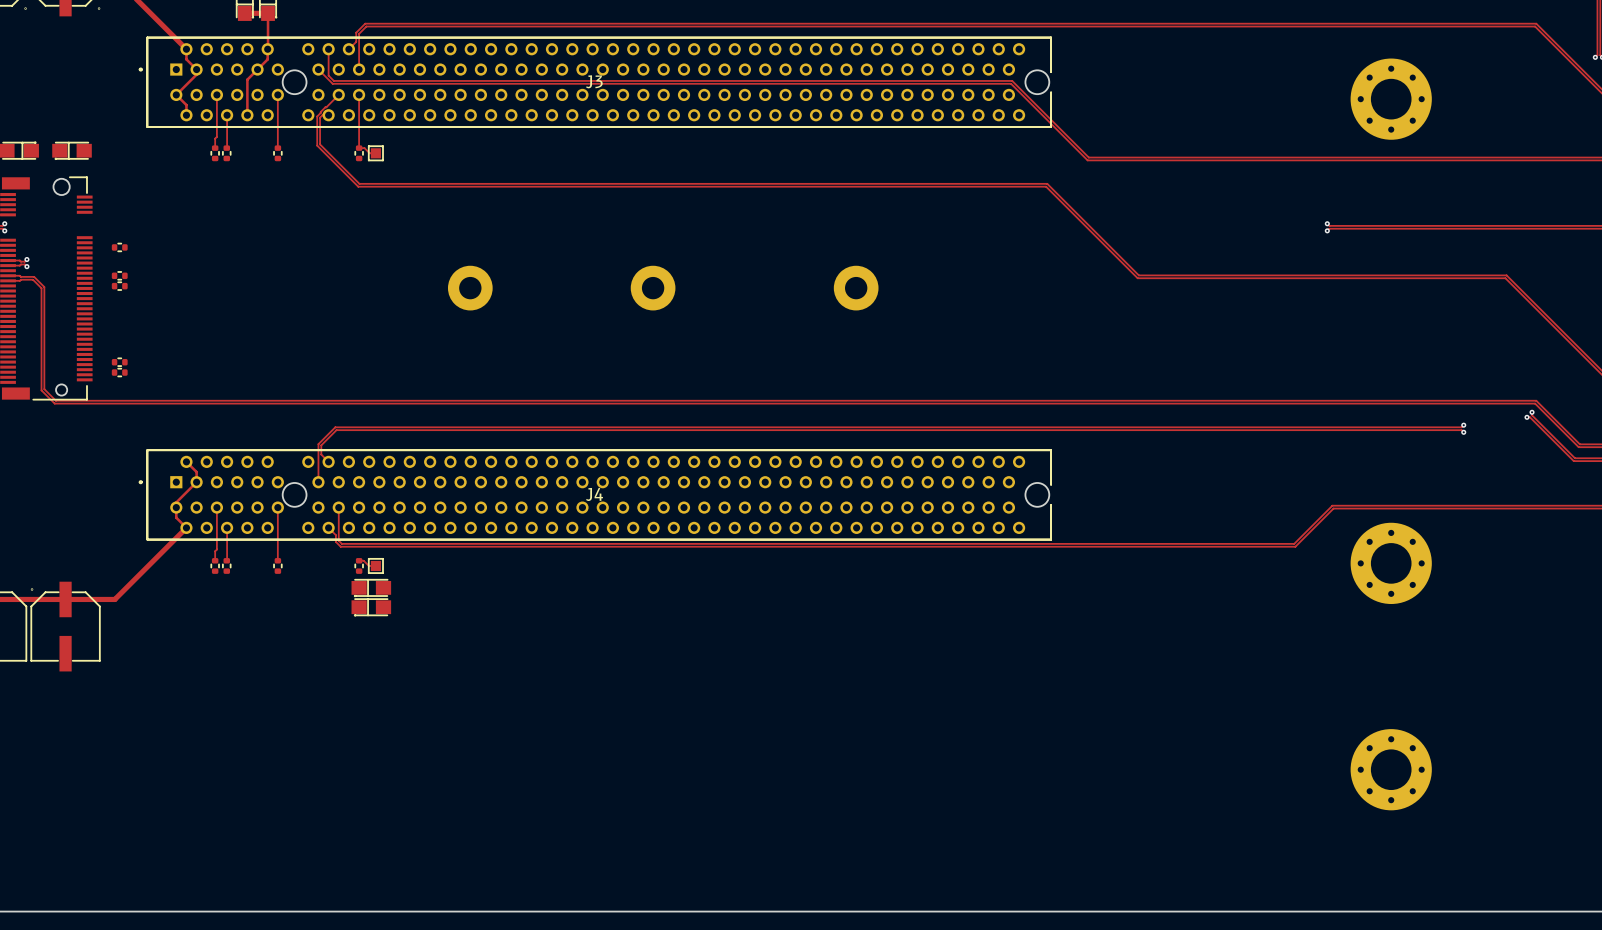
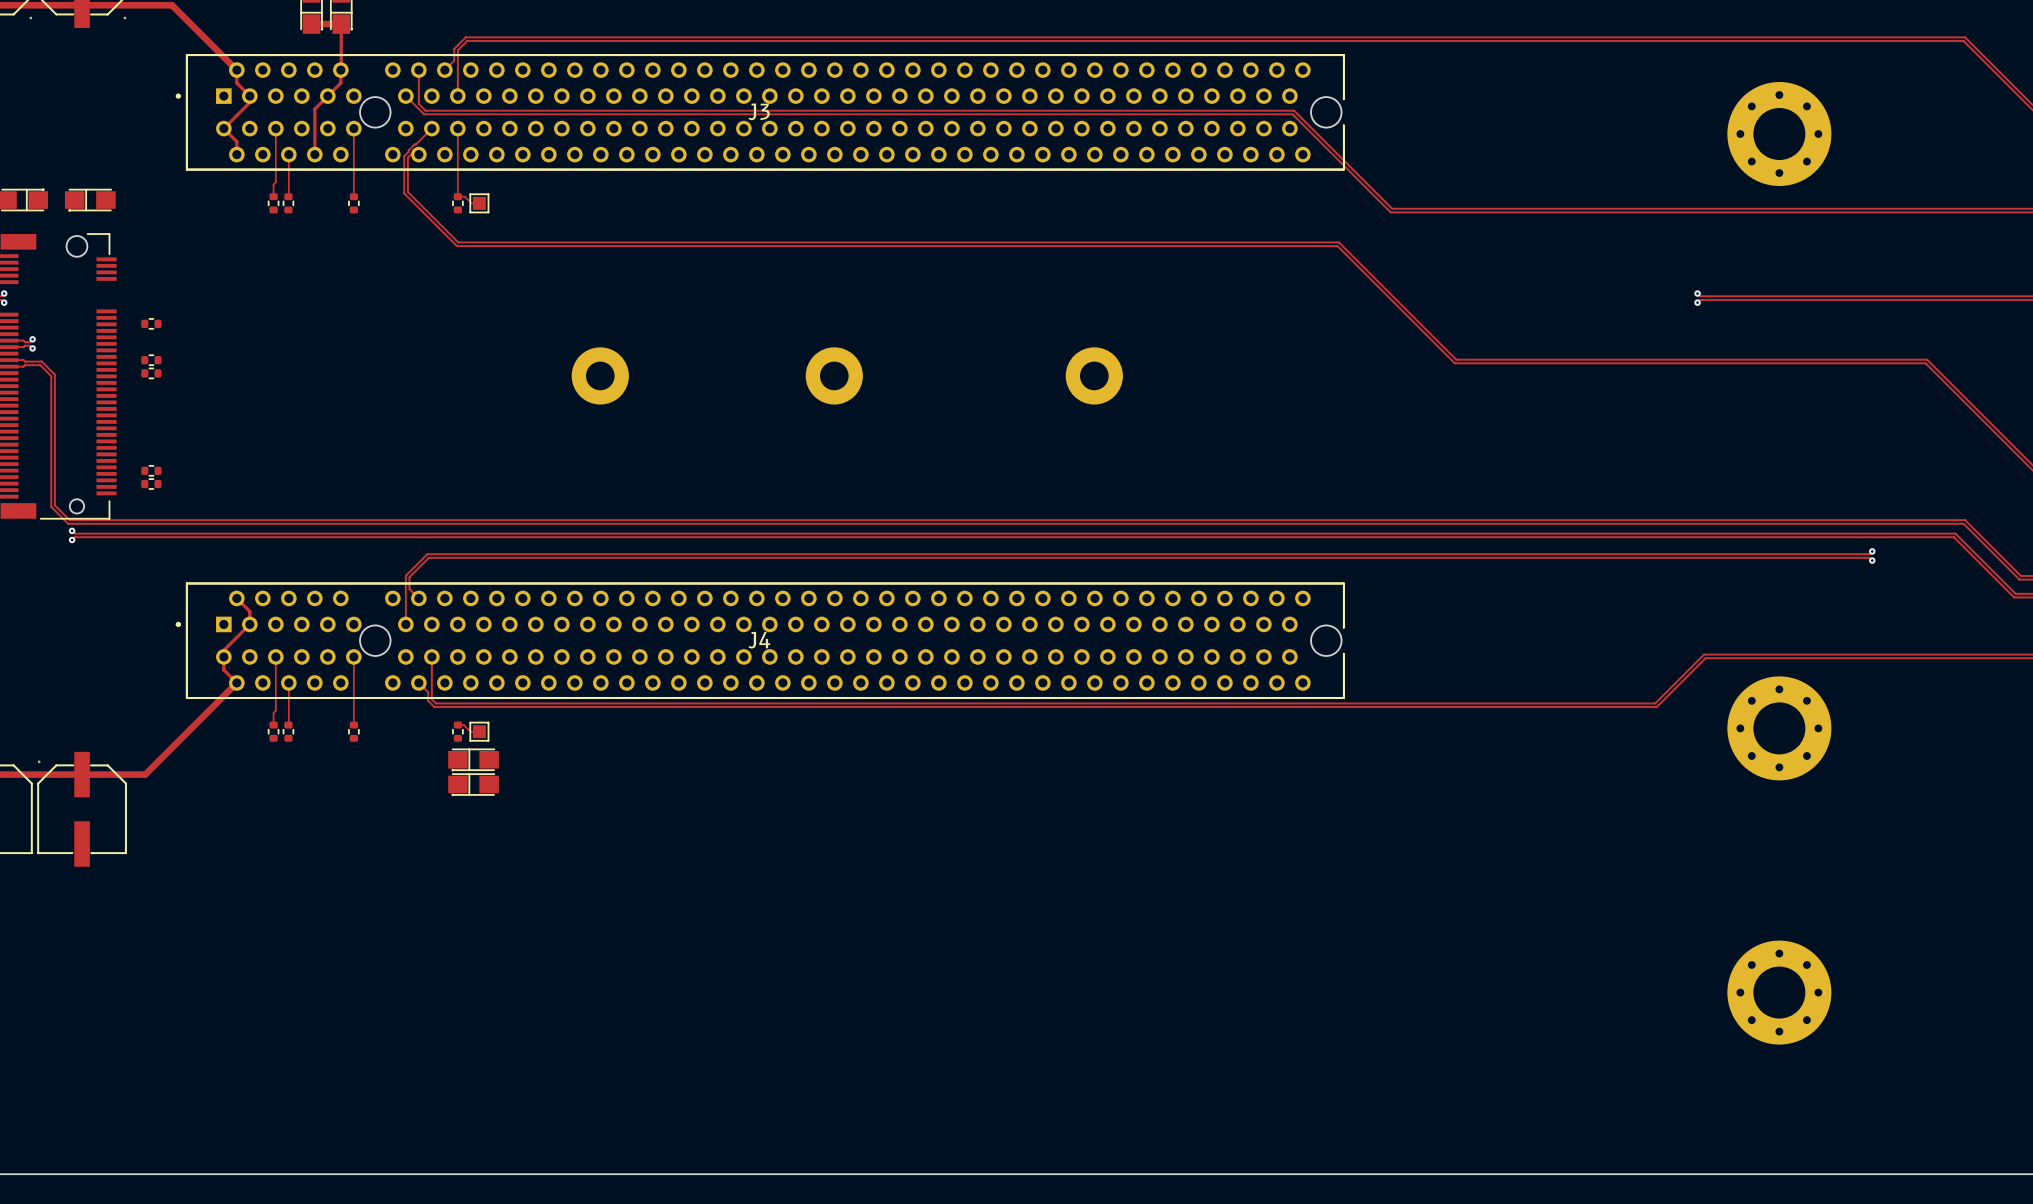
via: none -> (72, 530)
track: (1532, 412) (1532, 415) (1575, 458) -> (72, 530) (74, 533) (1955, 533) (2015, 593)
via: (1532, 412) -> none
via: none -> (72, 539)
track: (1527, 417) (1530, 417) (1574, 461) -> (72, 539) (74, 537) (1953, 537) (2014, 597)
via: (1527, 417) -> none

